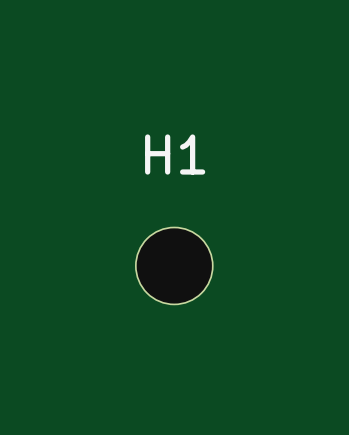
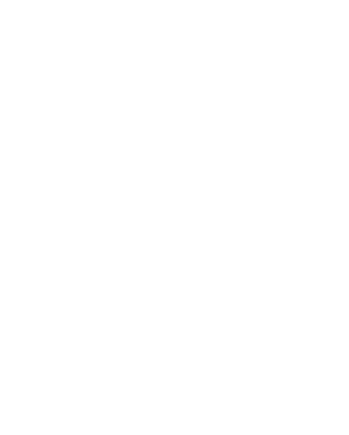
H1: (174, 265) -> none

